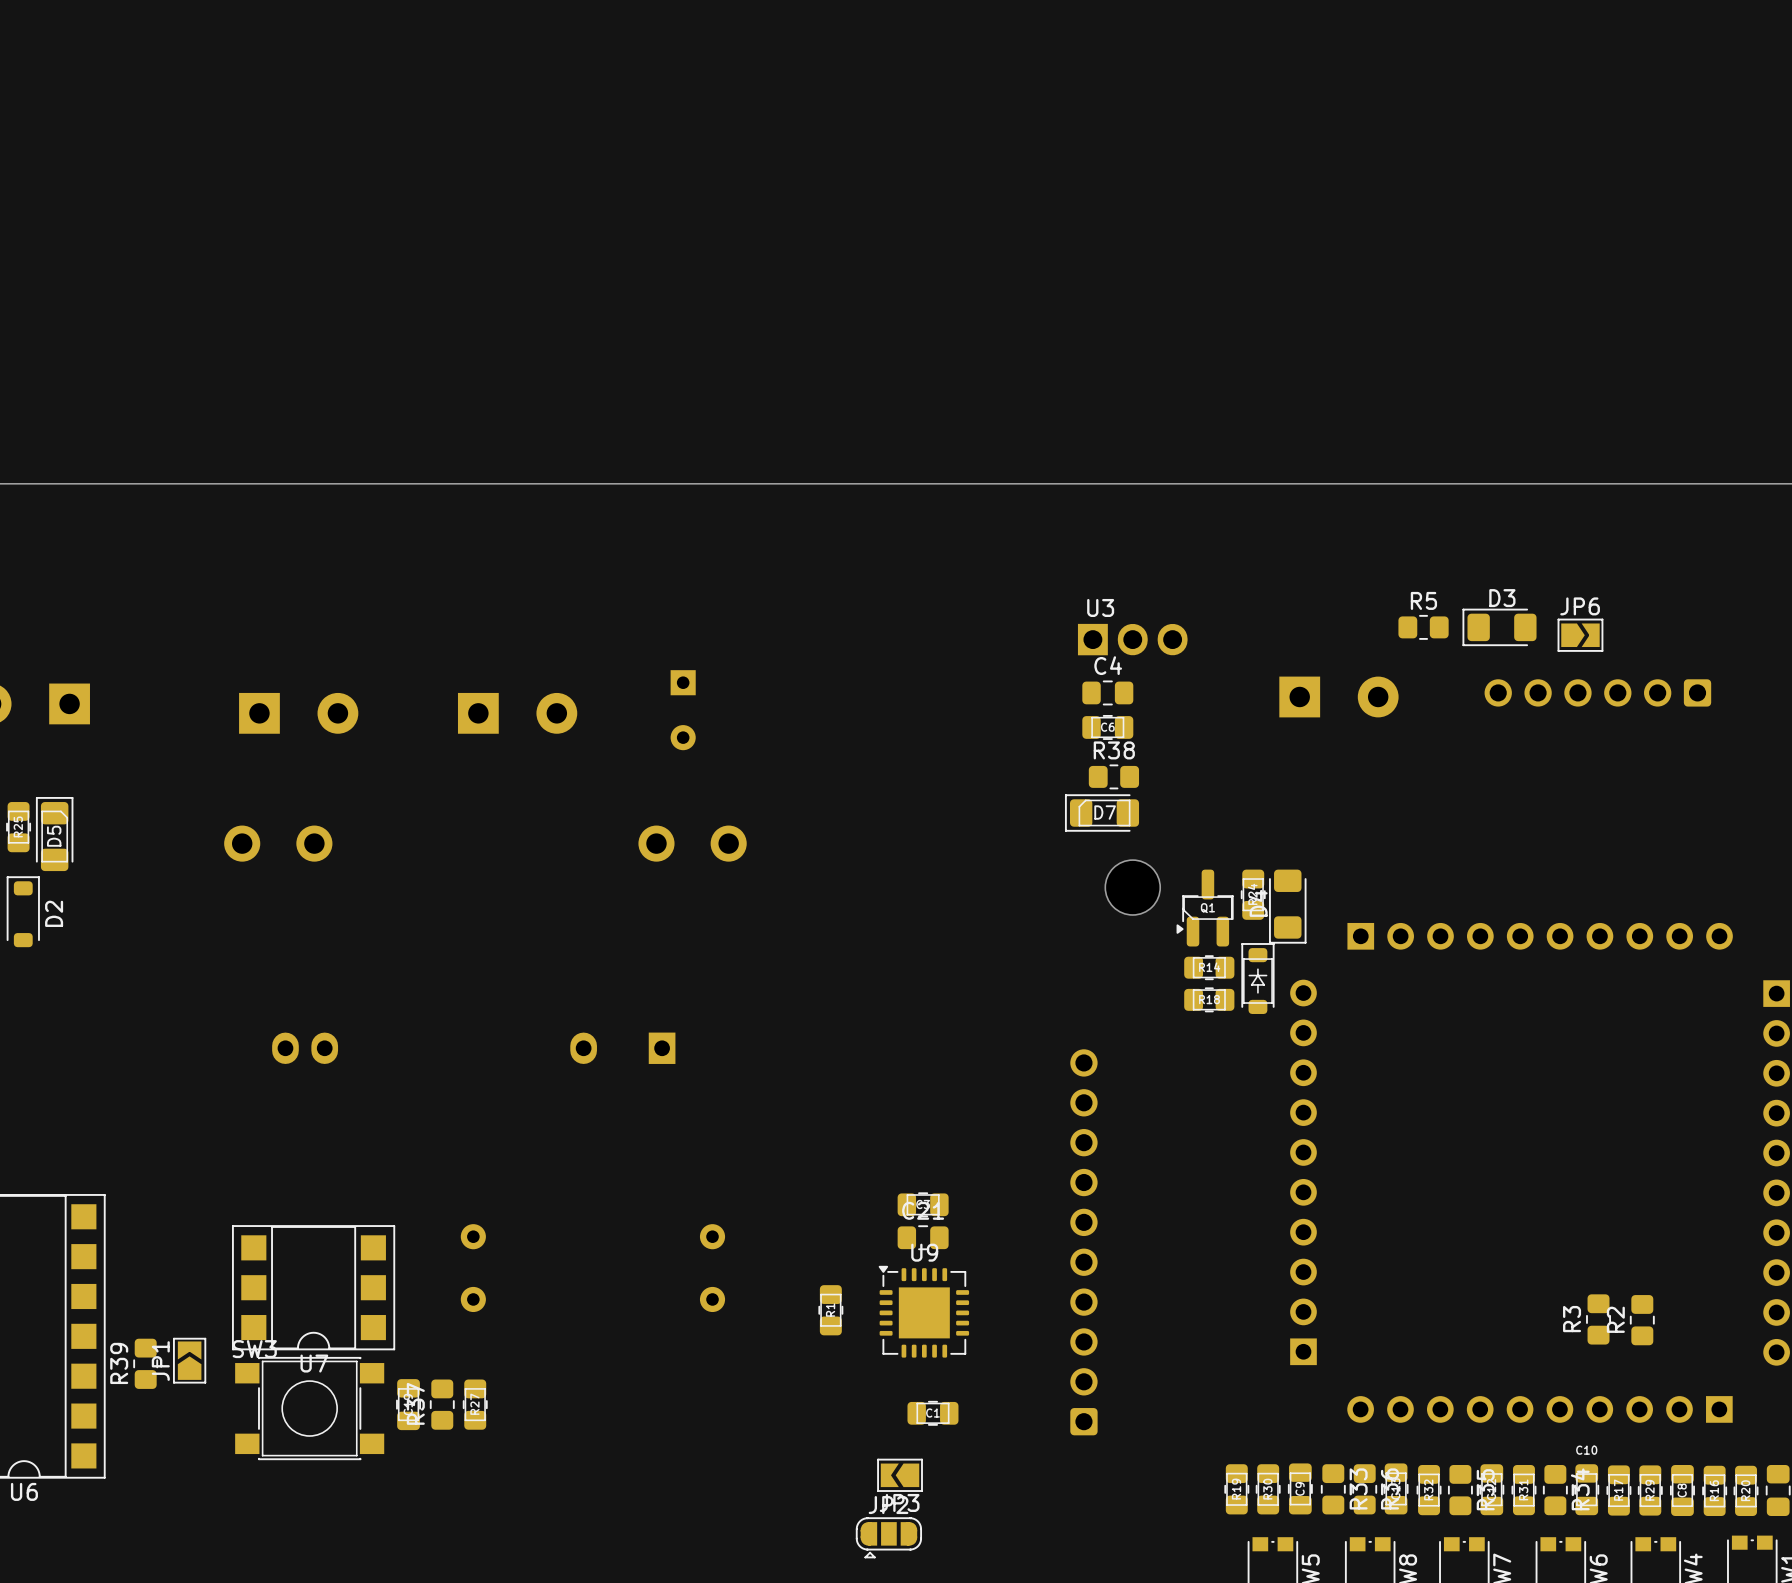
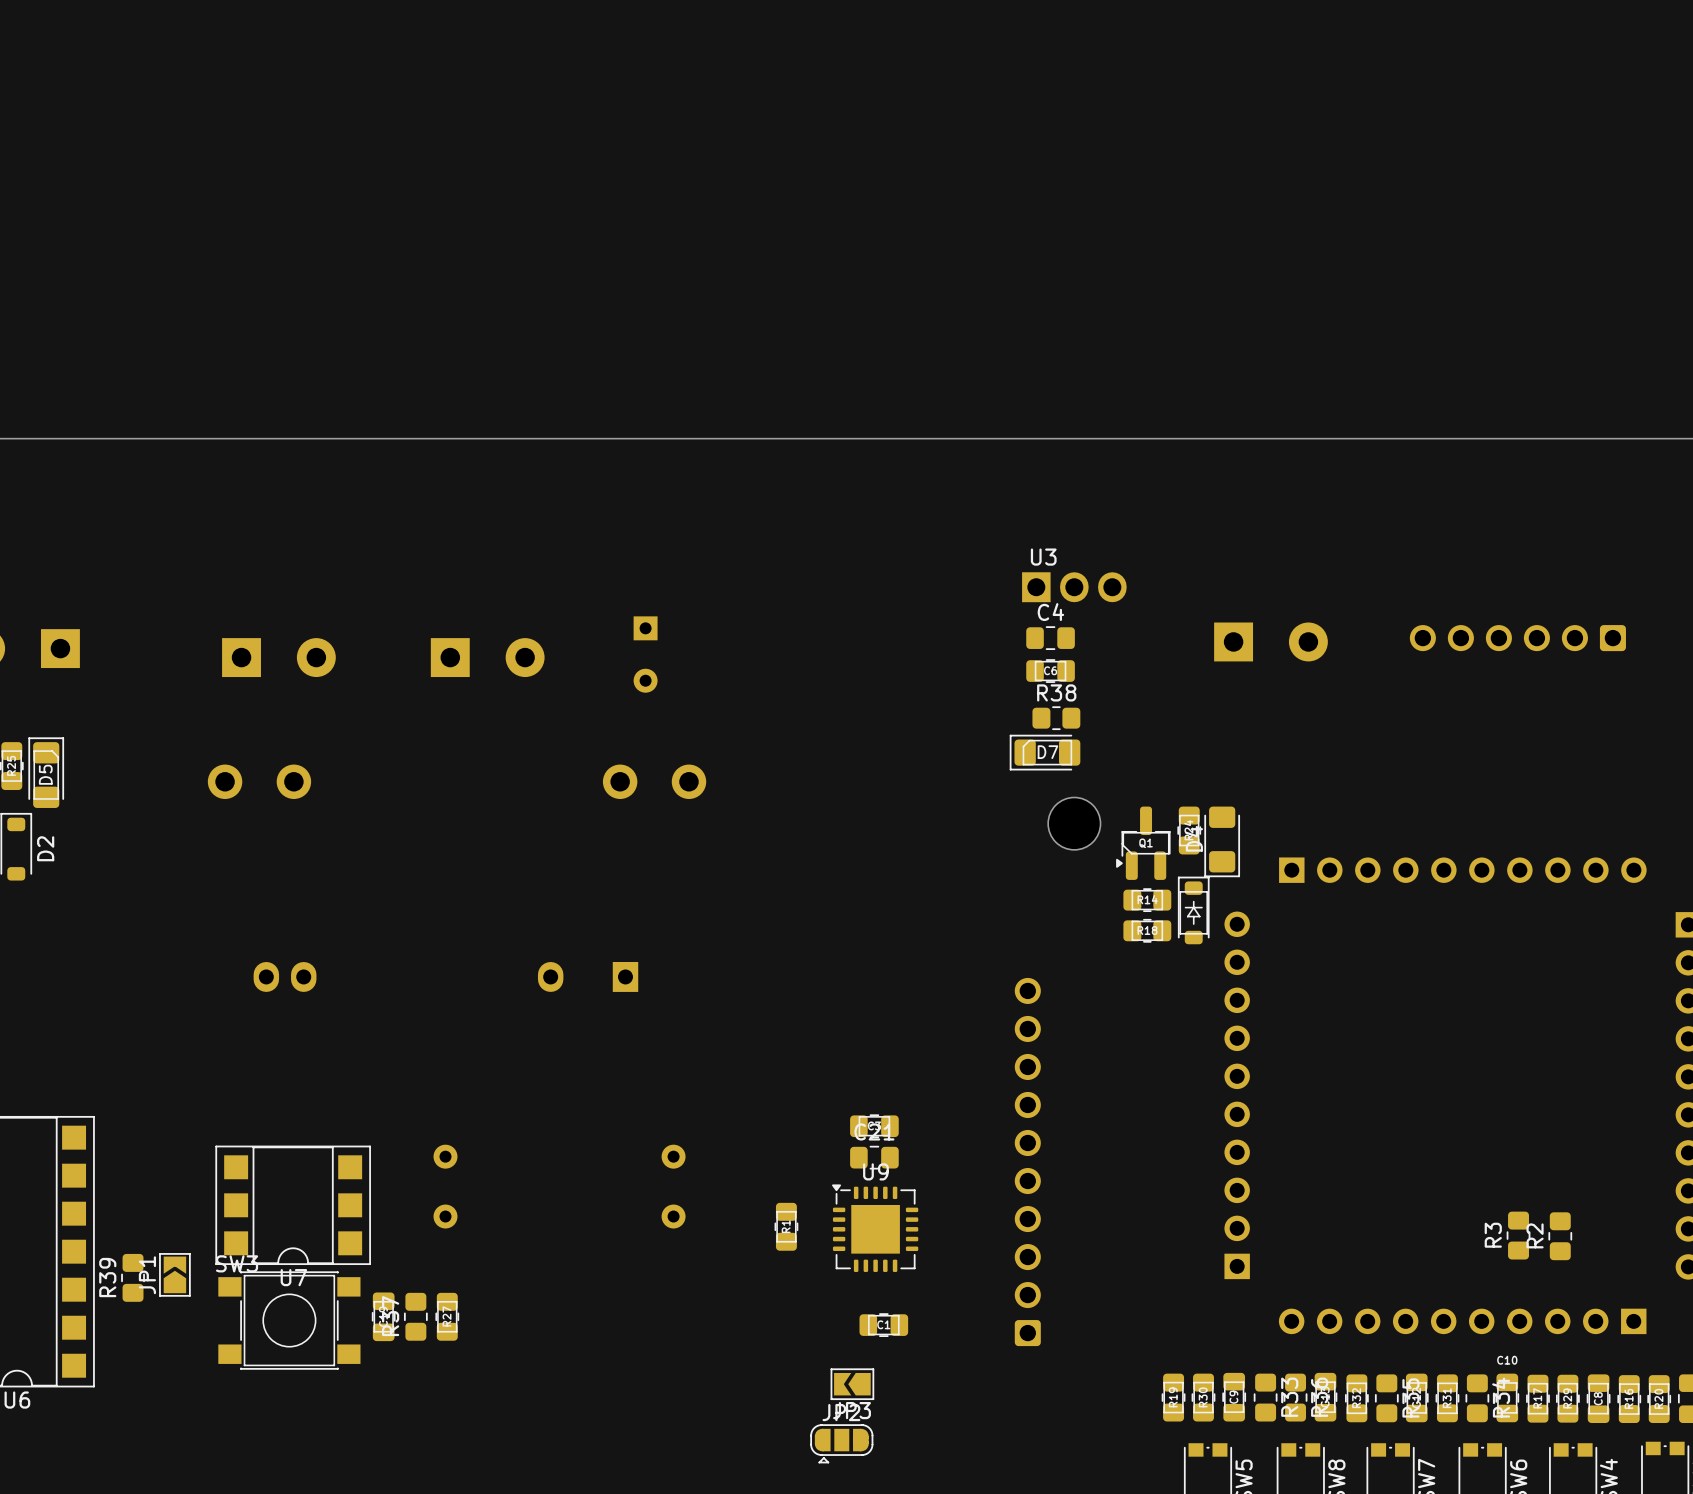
R5: (1423, 627) -> none
D3: (1499, 627) -> none
JP6: (1580, 635) -> none

